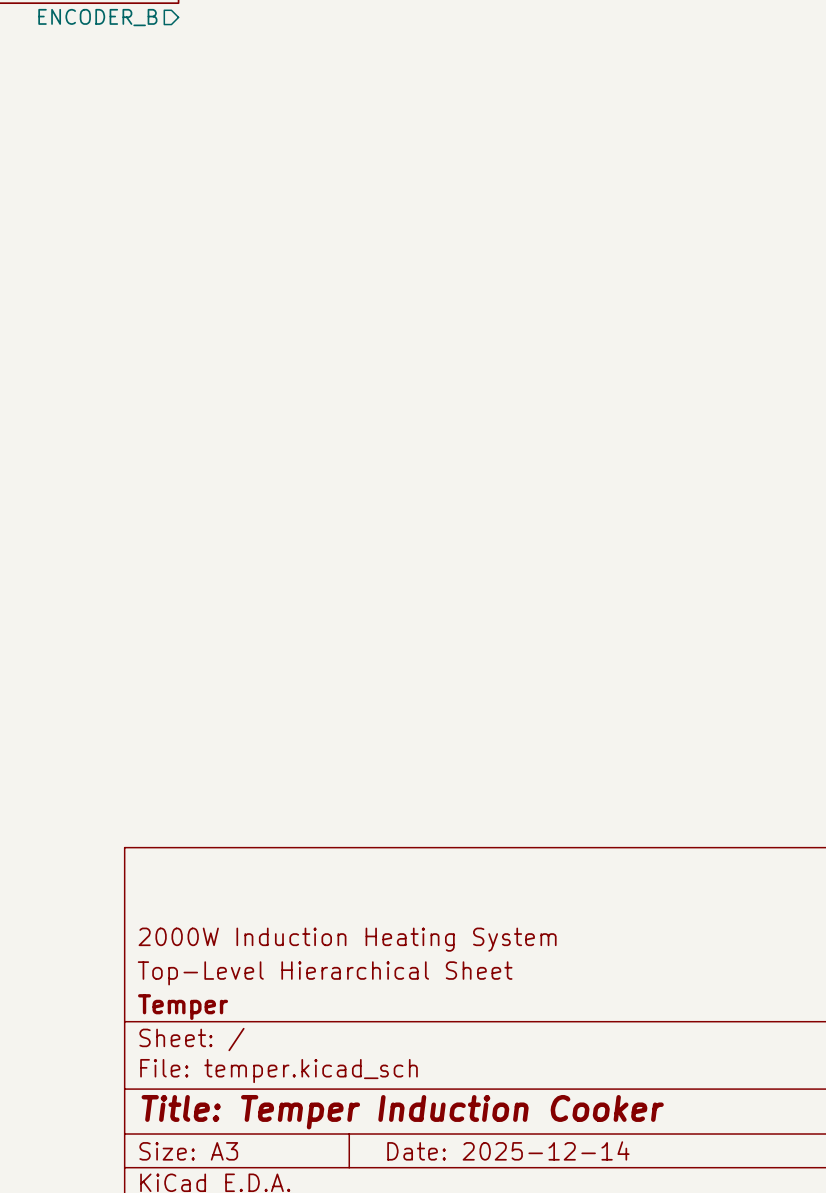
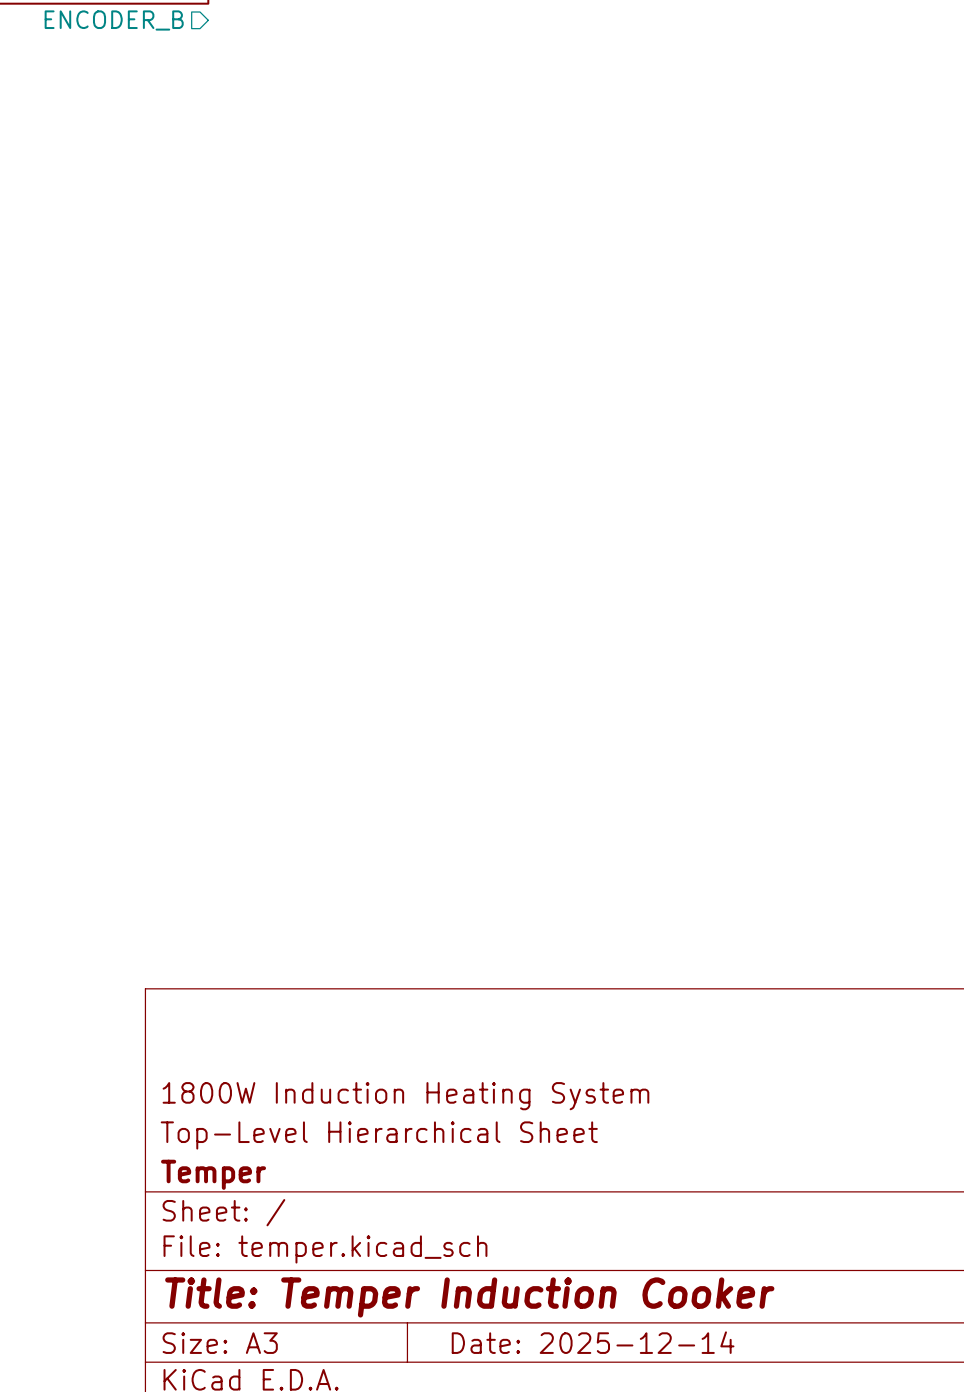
title block: 2000W Induction Heating System (347, 939) -> 1800W Induction Heating System (405, 1096)

